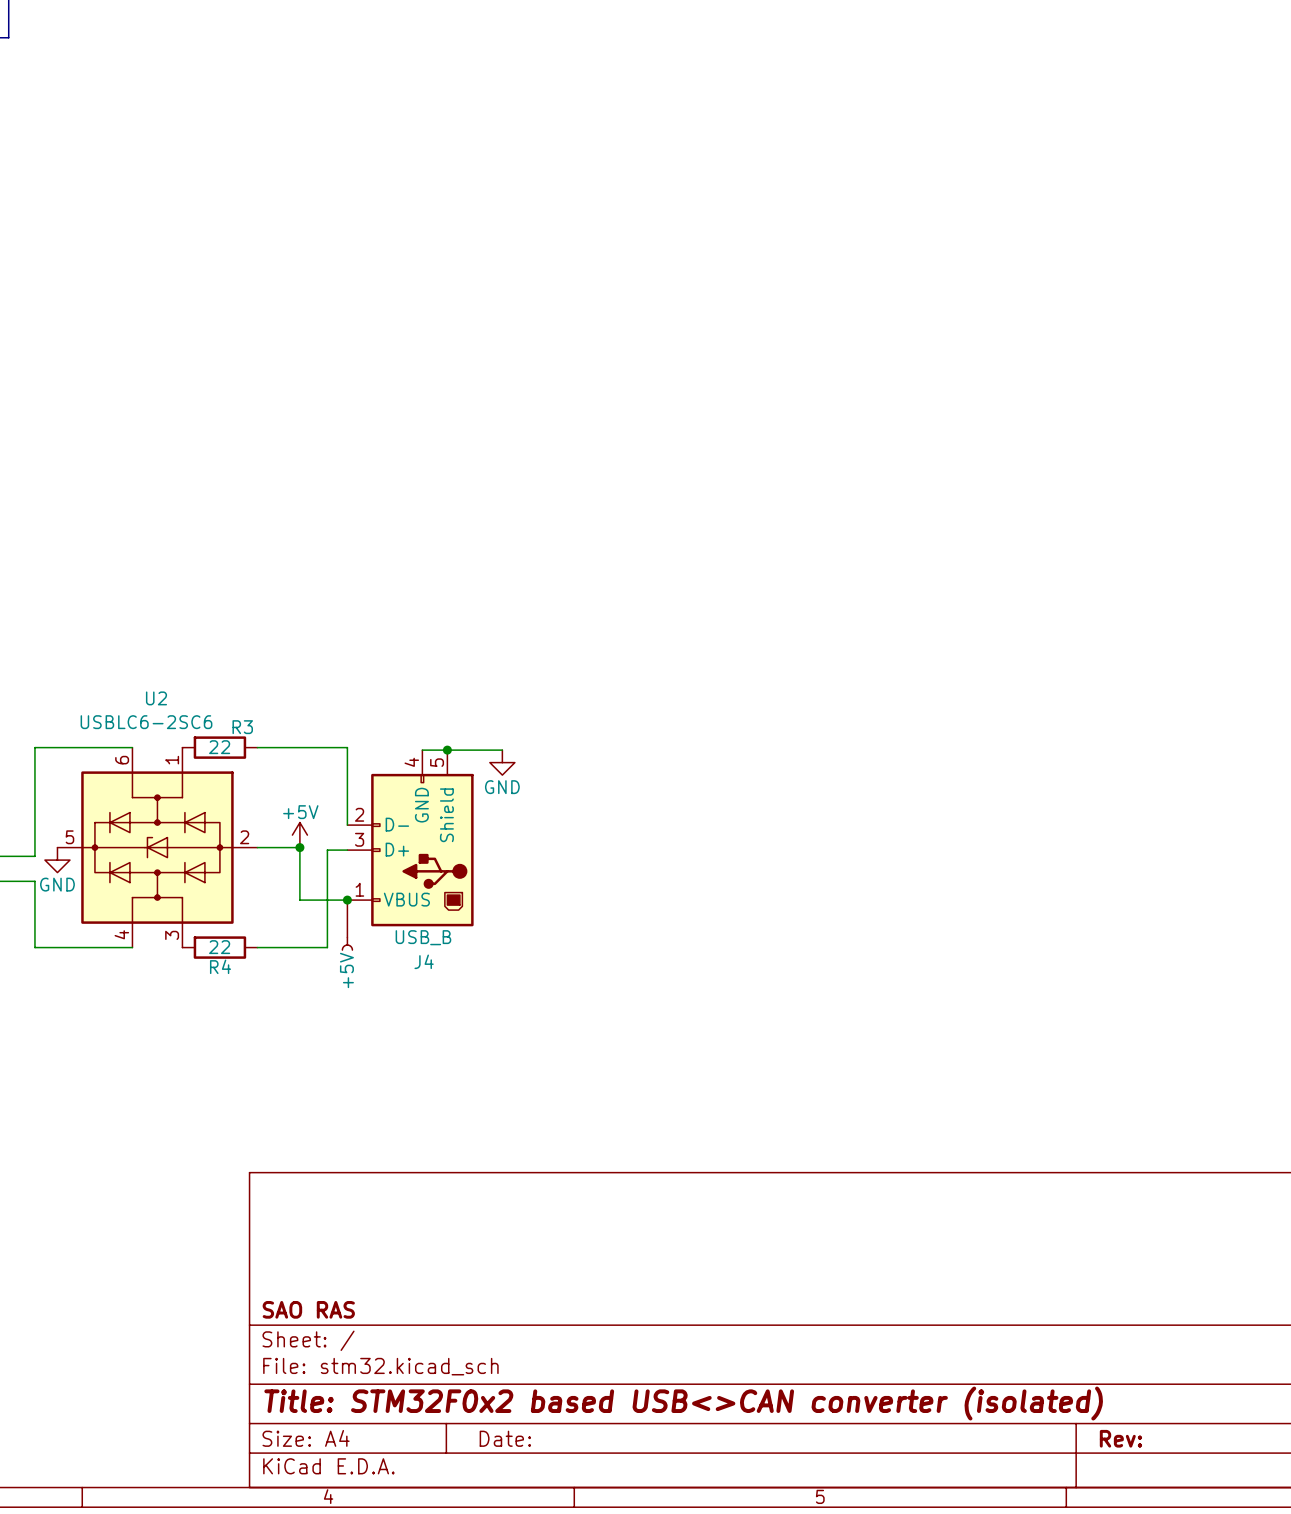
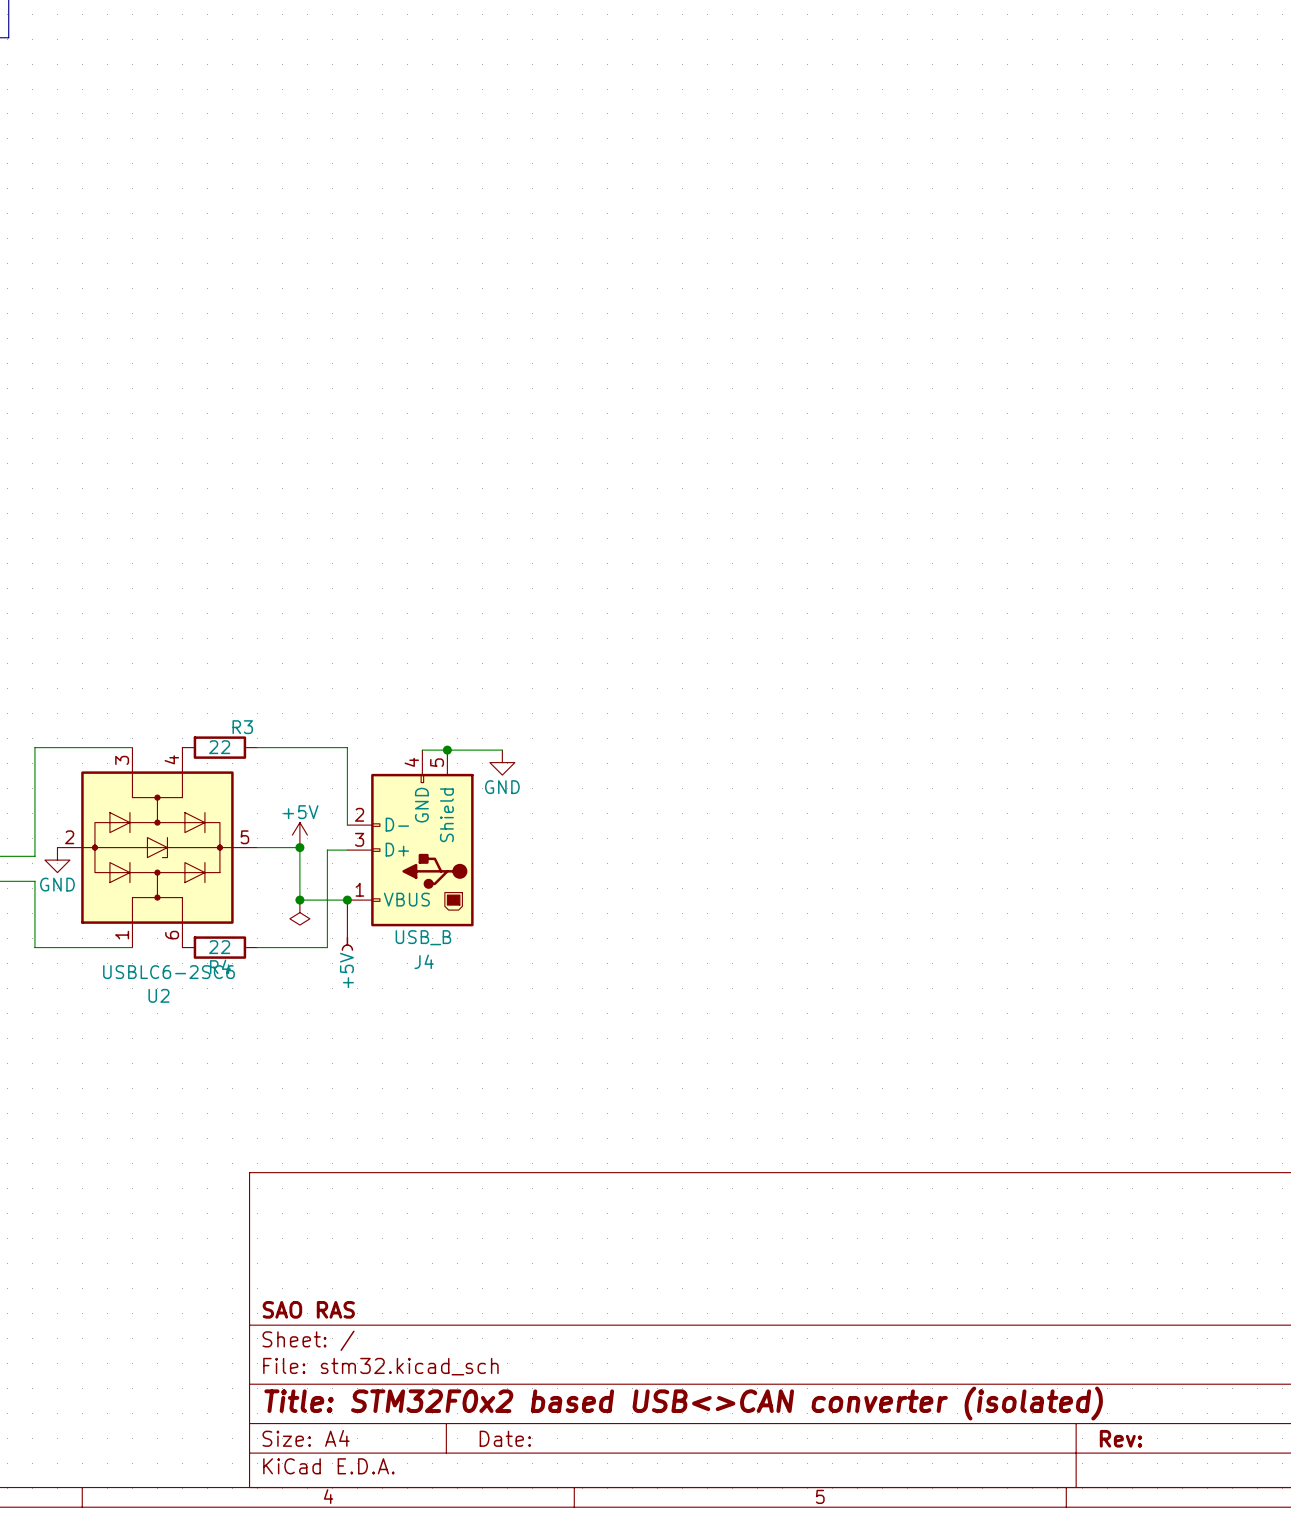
U2 rotation: 0° (157, 847) -> 180° (157, 847)
junction: none -> (299, 900)
power symbol: none -> (299, 912)

